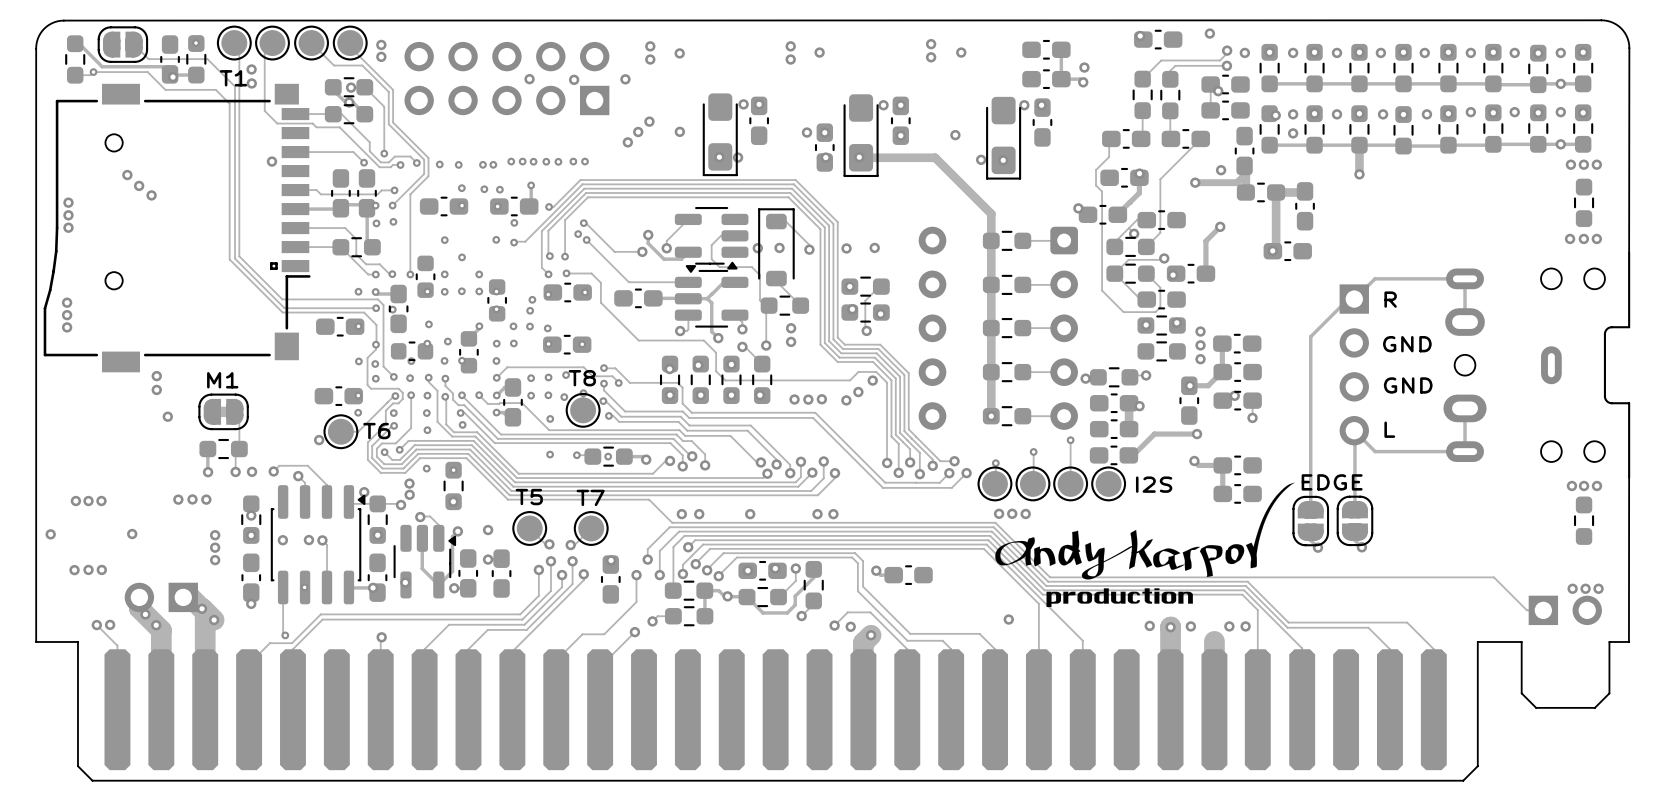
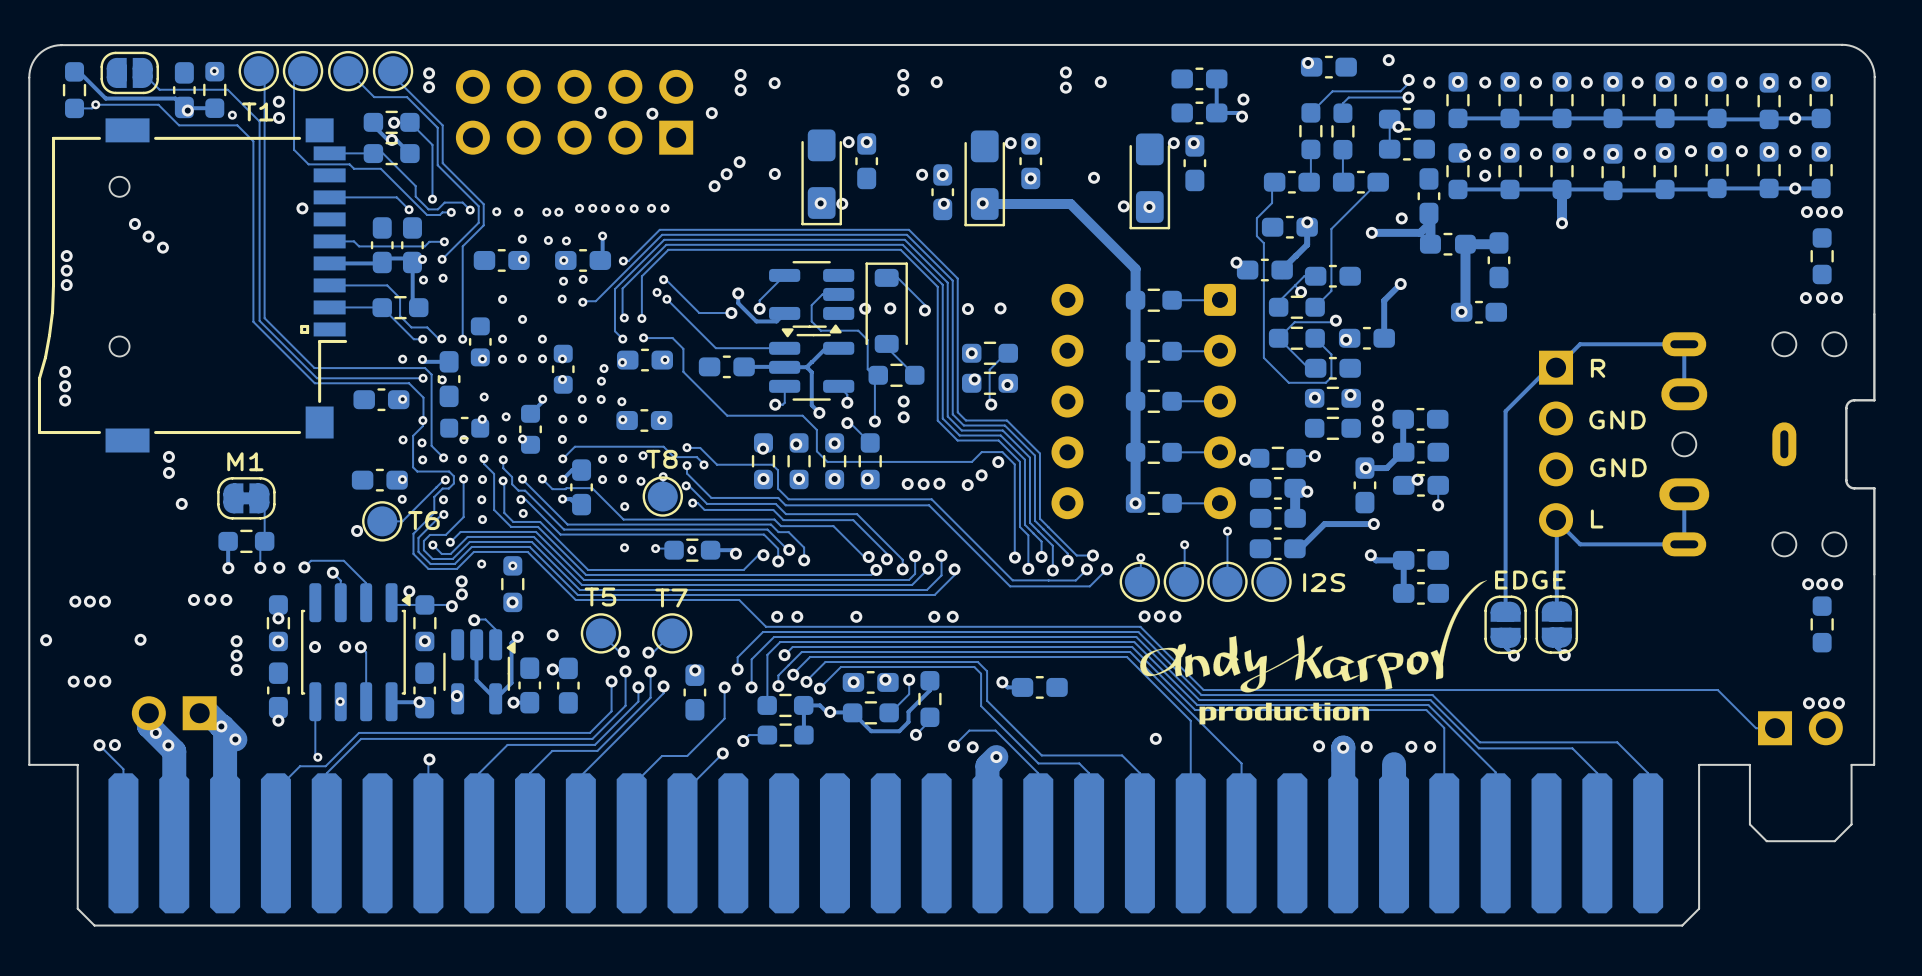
via: none -> (232, 115)
via: none -> (563, 281)

